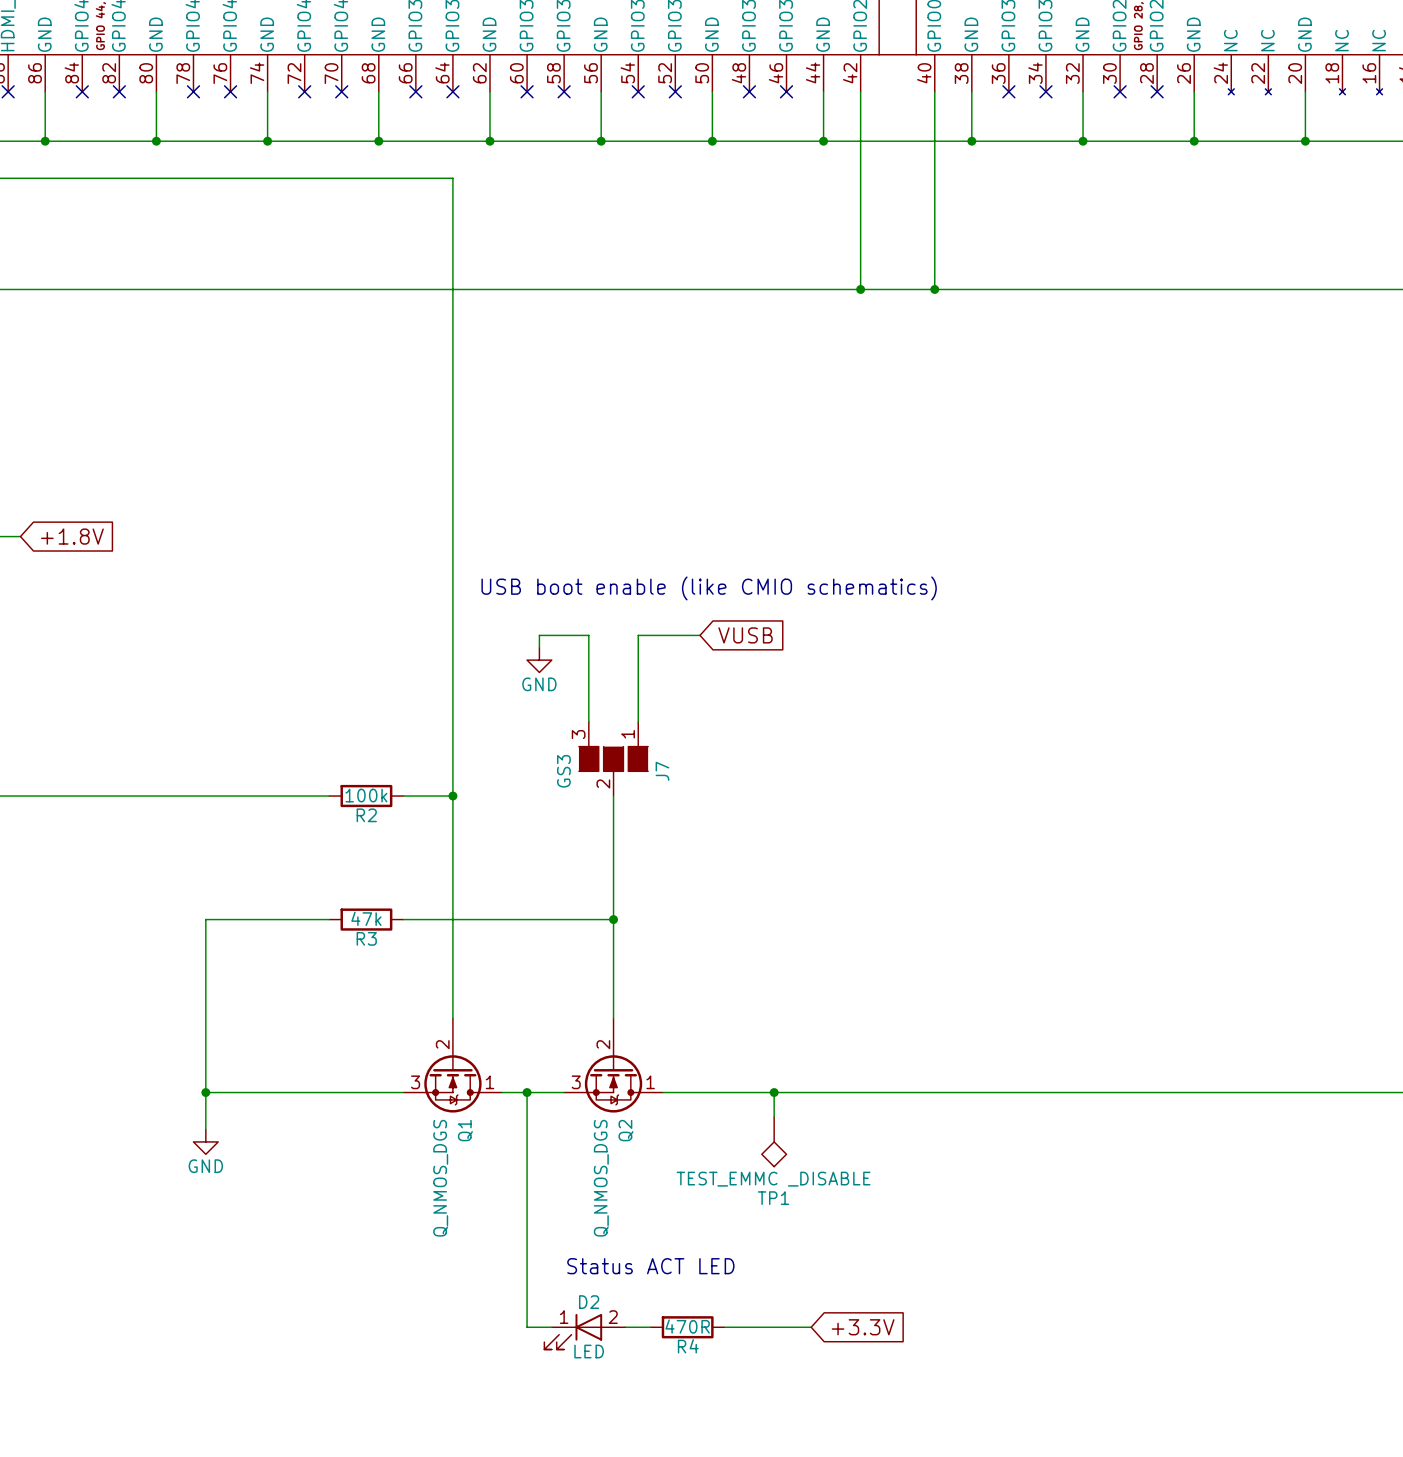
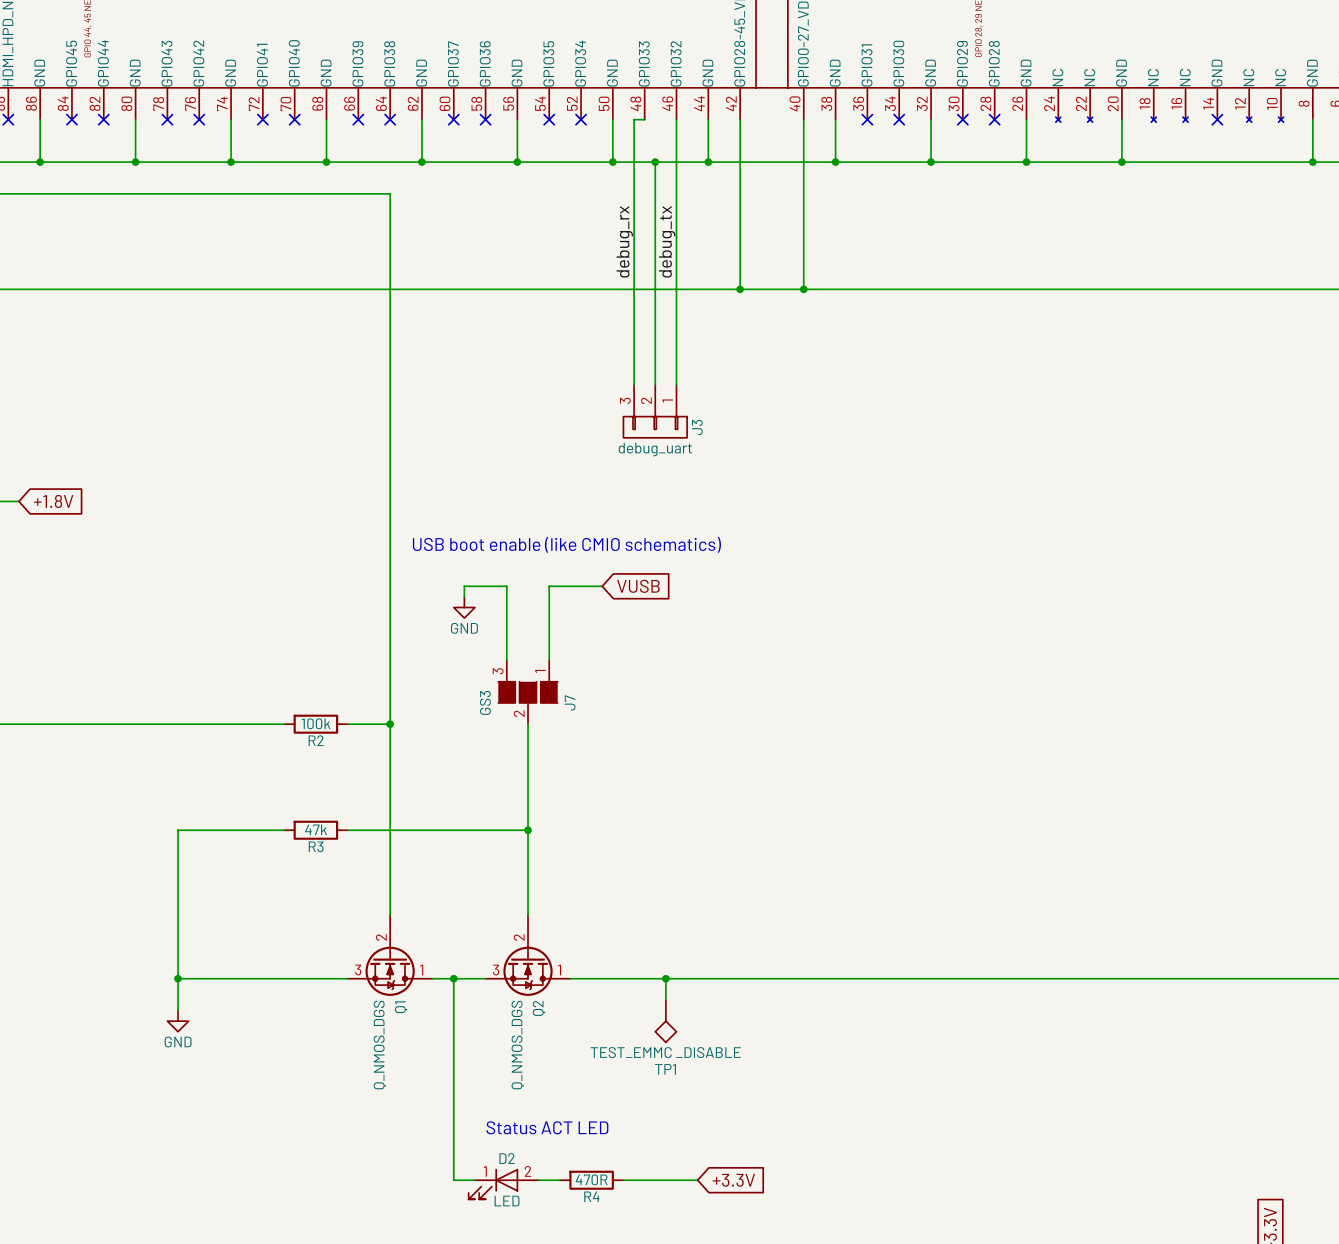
wire: none -> (644, 119) (634, 119) (634, 384)
no-connect mark: (749, 91) -> none
wire: none -> (676, 119) (676, 384)
no-connect mark: (786, 91) -> none
wire: none -> (655, 162) (655, 384)
junction: none -> (655, 162)
label: none -> debug_rx (624, 241)
label: none -> debug_tx (667, 241)
J3: none -> debug_uart (655, 411)

